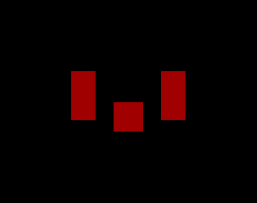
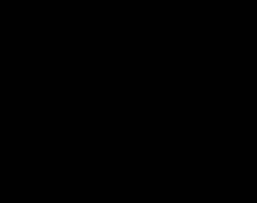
part: (128, 101) -> none

